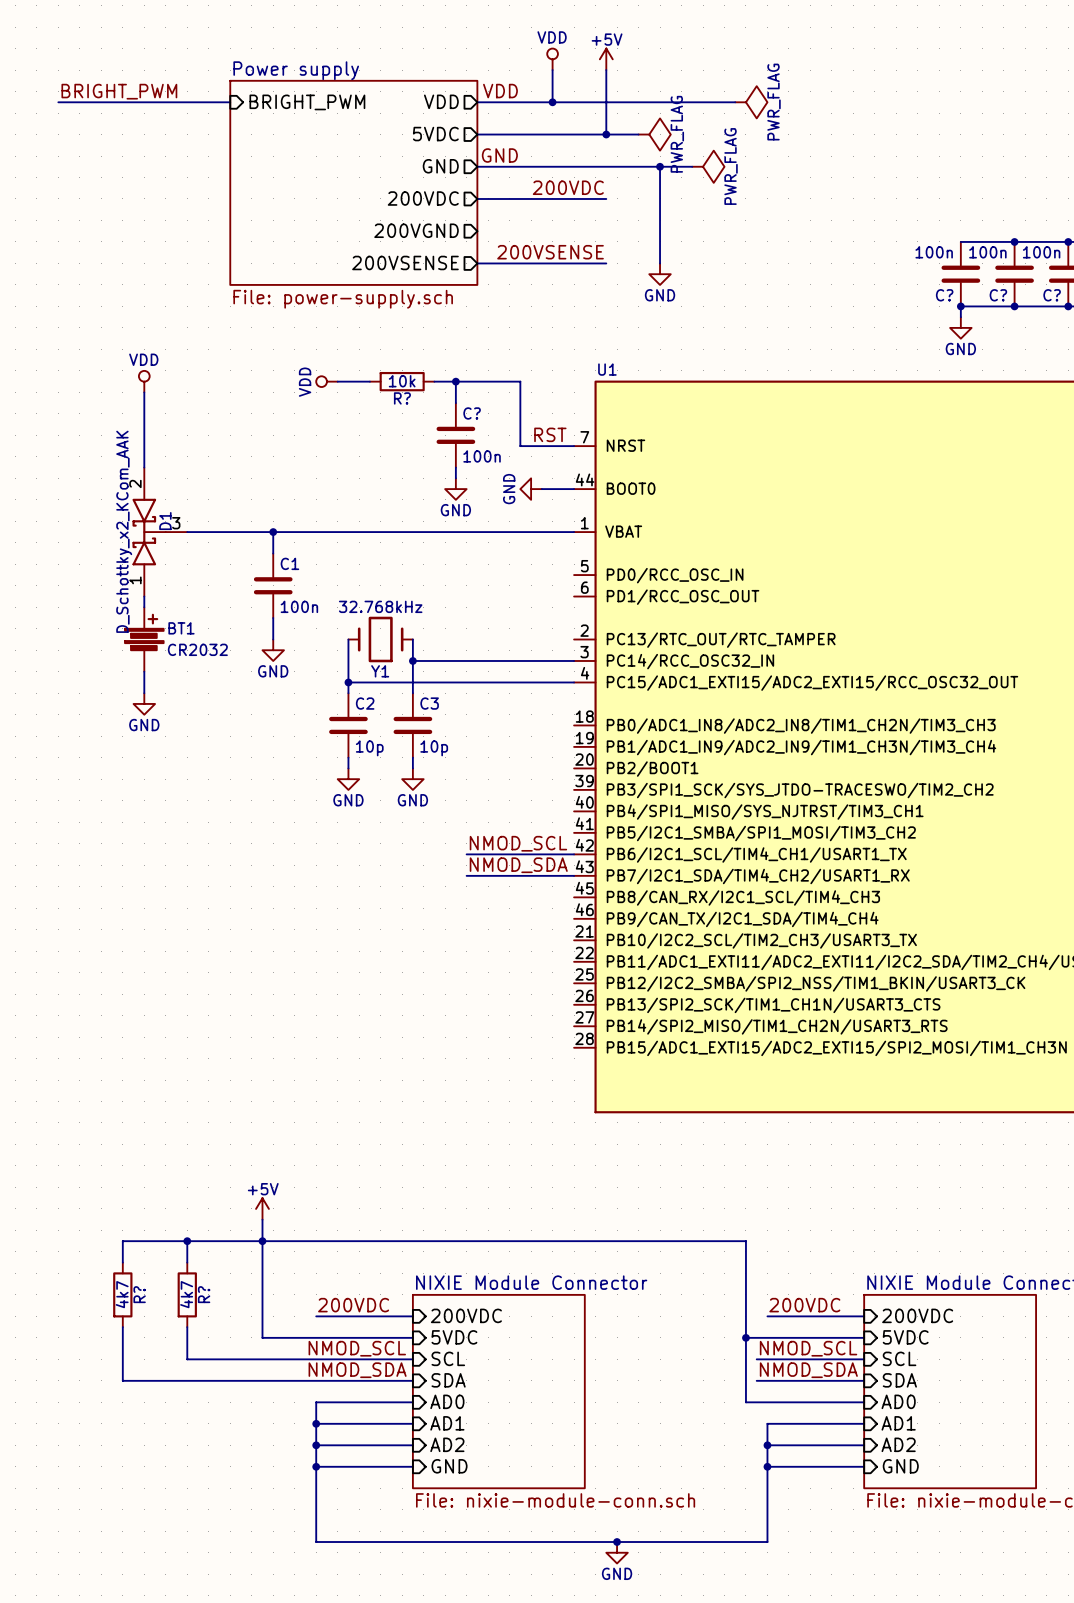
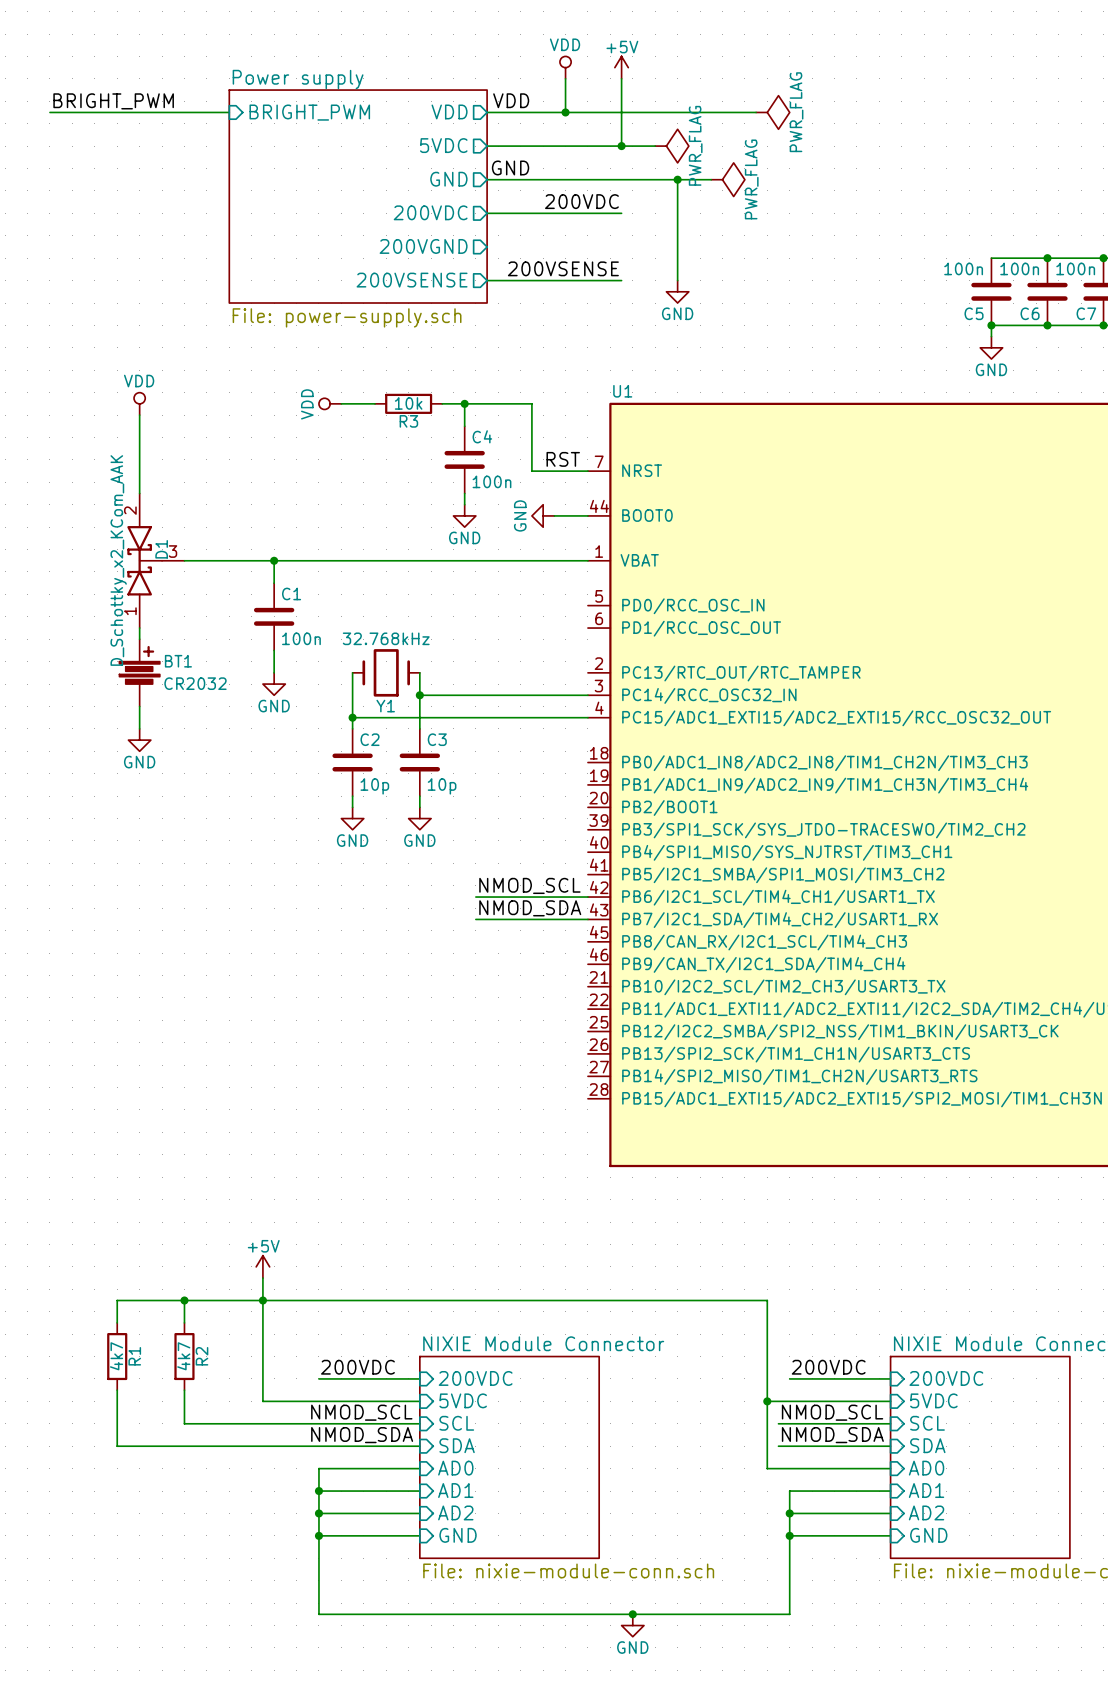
C? name: C? (944, 295) -> C5 (974, 313)
C? name: C? (998, 295) -> C6 (1030, 313)
C? name: C? (1052, 295) -> C7 (1086, 313)
R? name: R? (402, 398) -> R3 (408, 421)
C? name: C? (472, 413) -> C4 (482, 436)
R? name: R? (139, 1294) -> R1 (134, 1356)
R? name: R? (204, 1294) -> R2 (201, 1356)

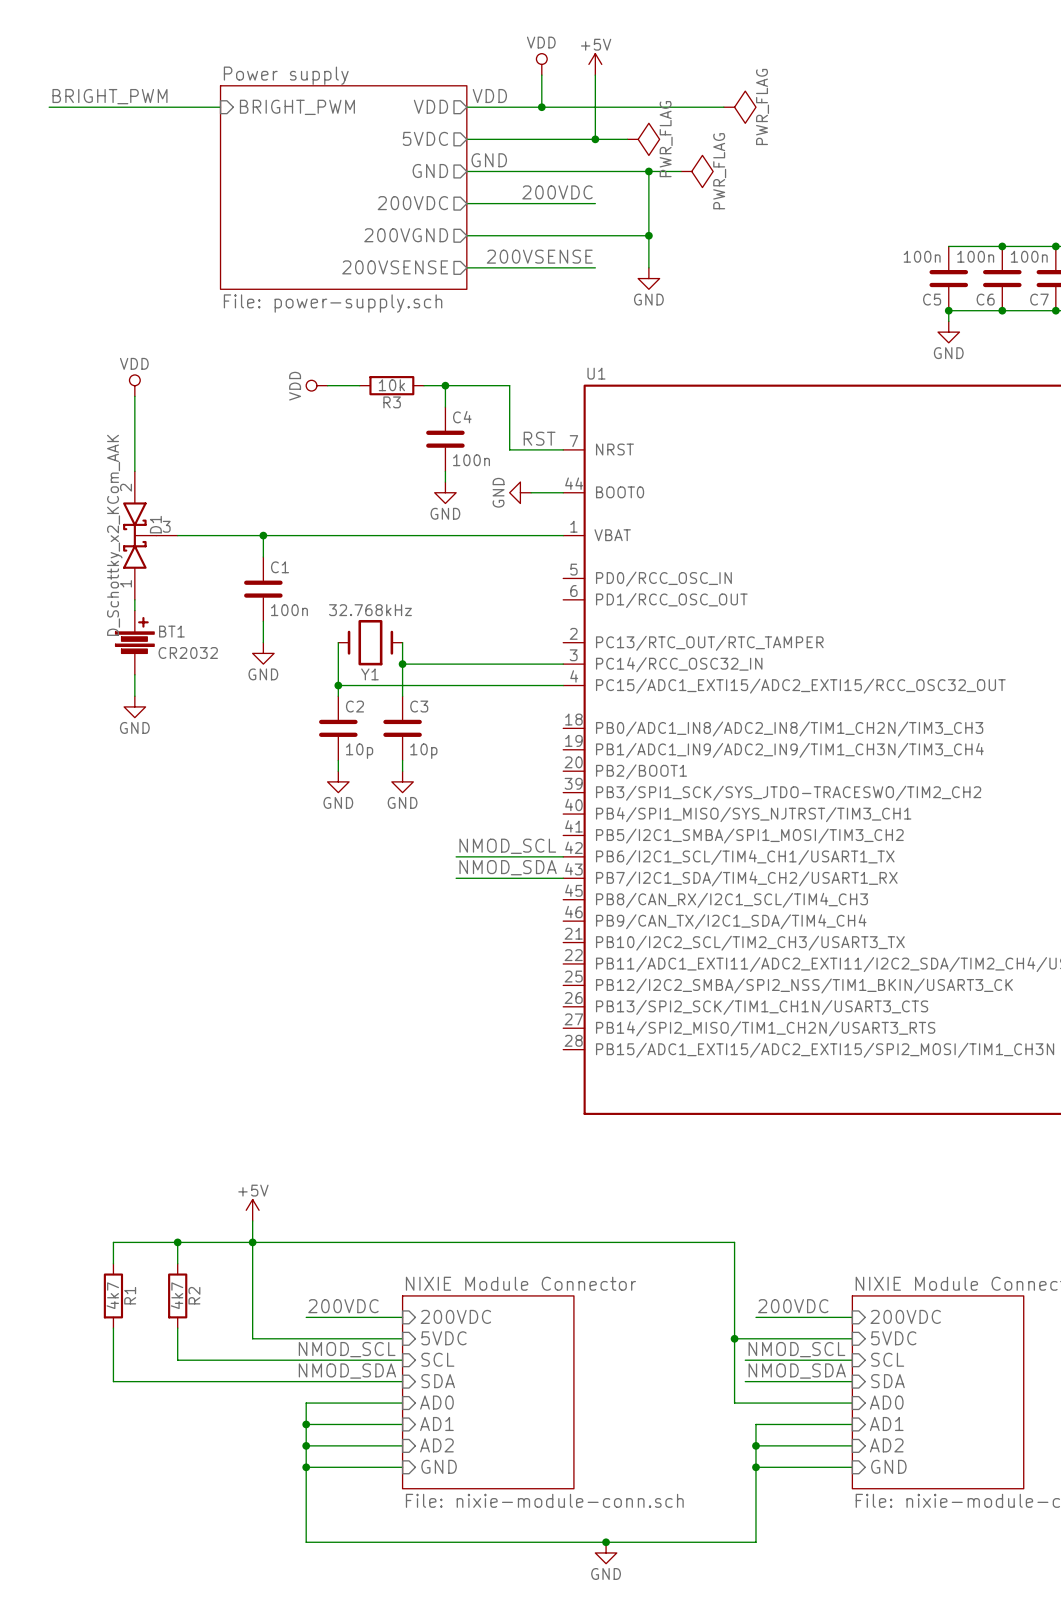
wire: none -> (466, 235) (648, 235)
junction: none -> (648, 235)

